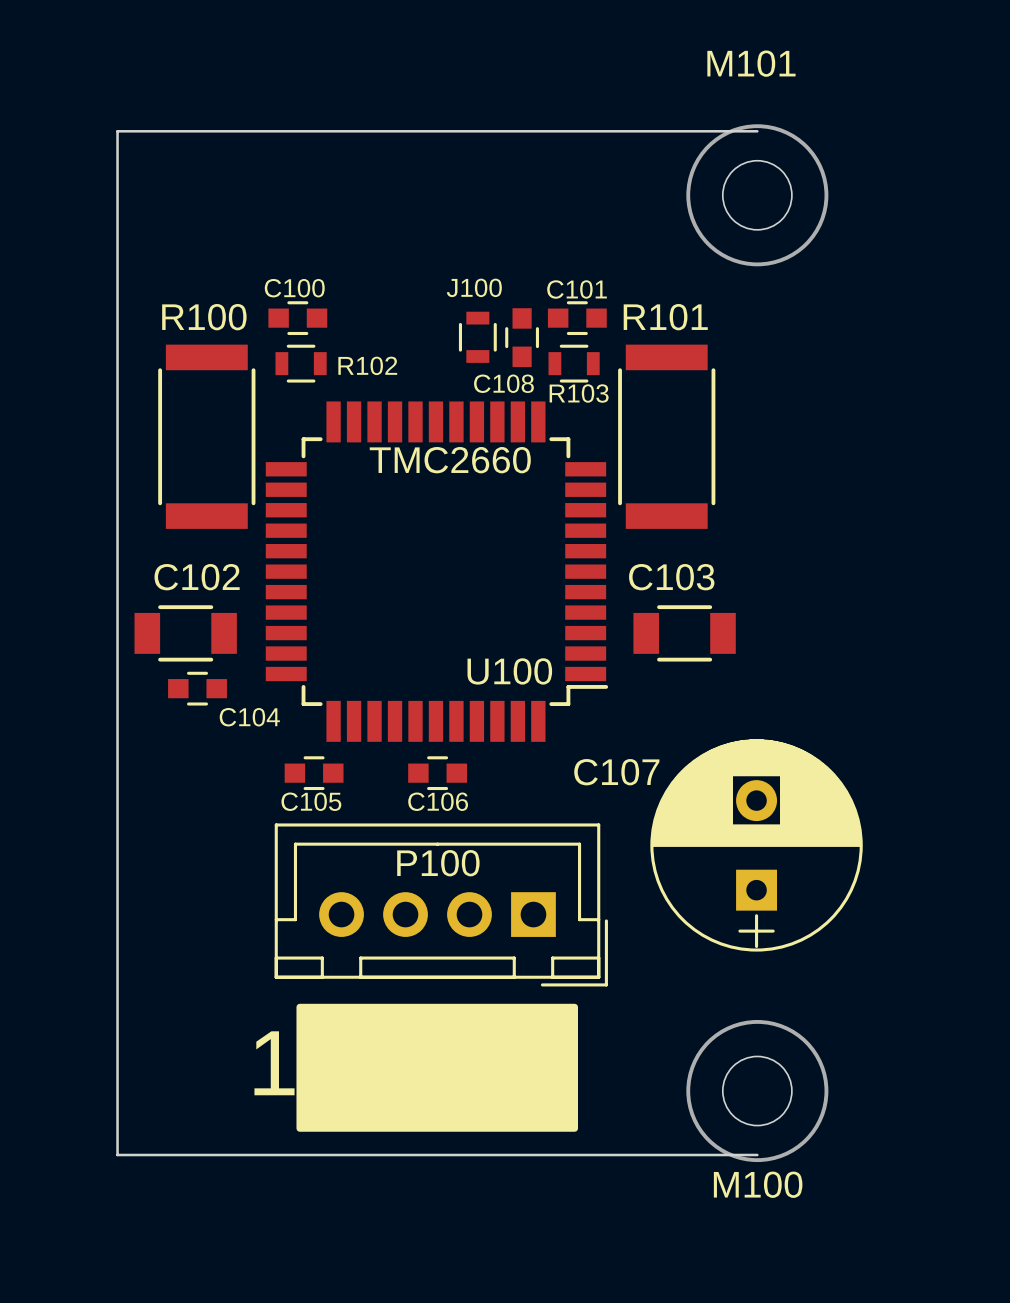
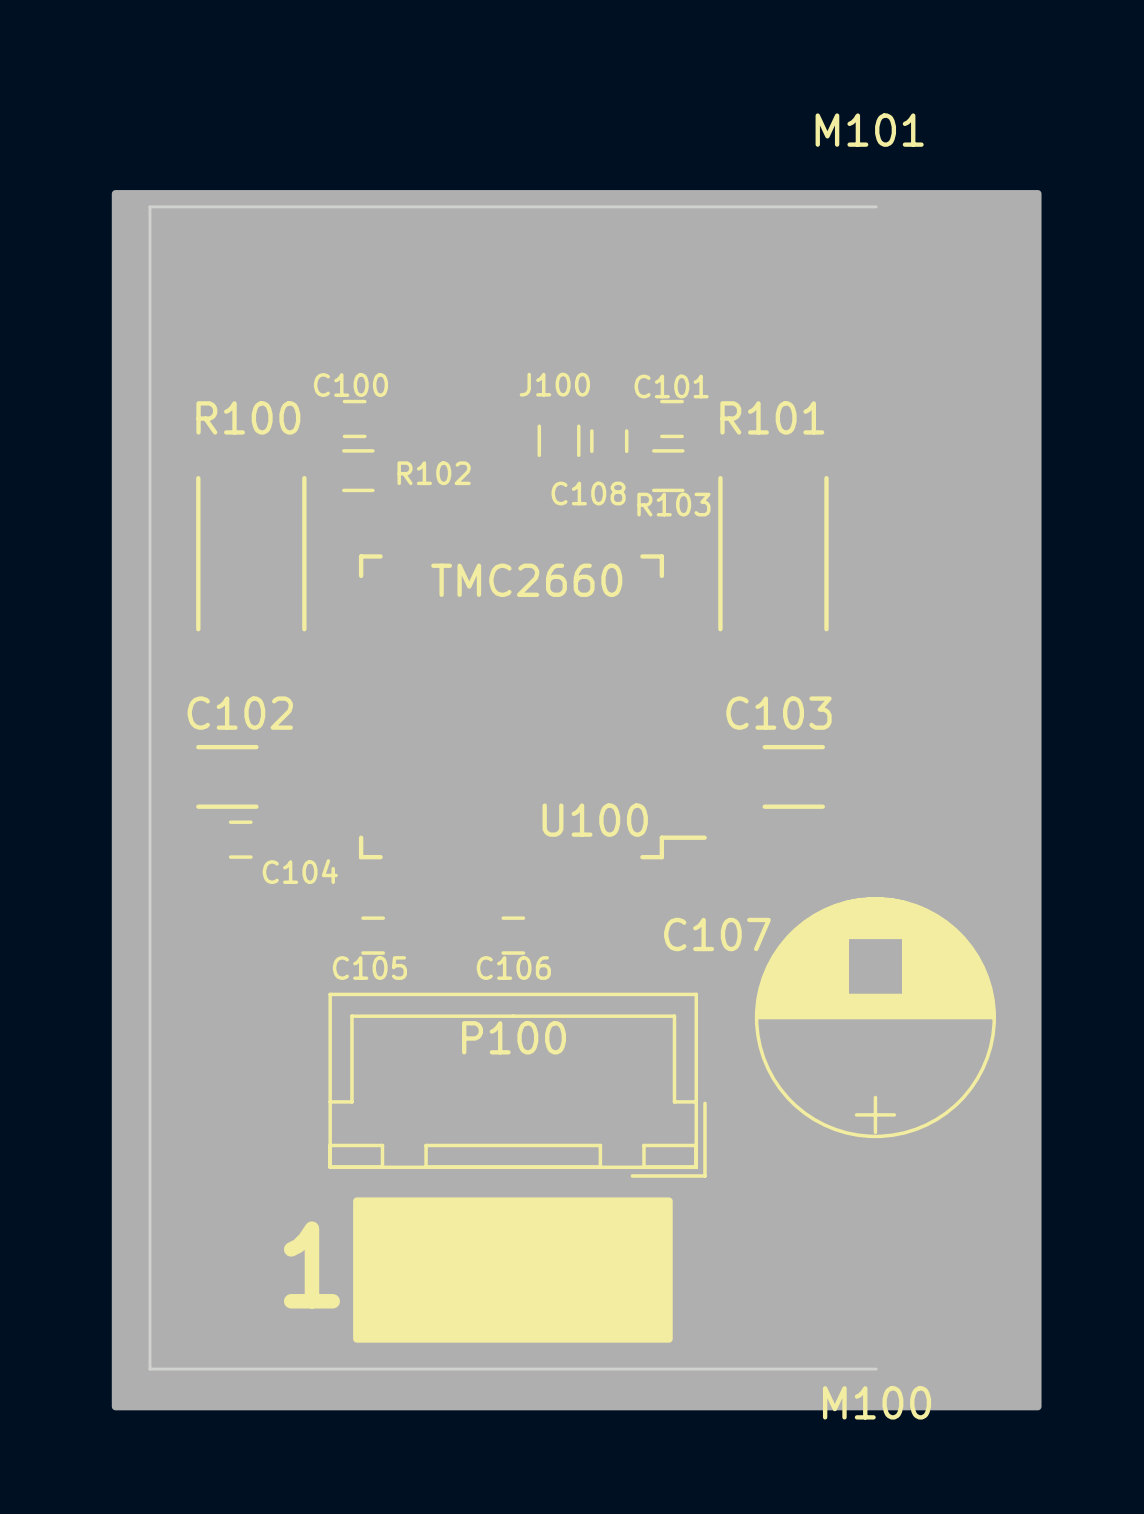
drawing: none -> [111, 190, 1042, 1411]

